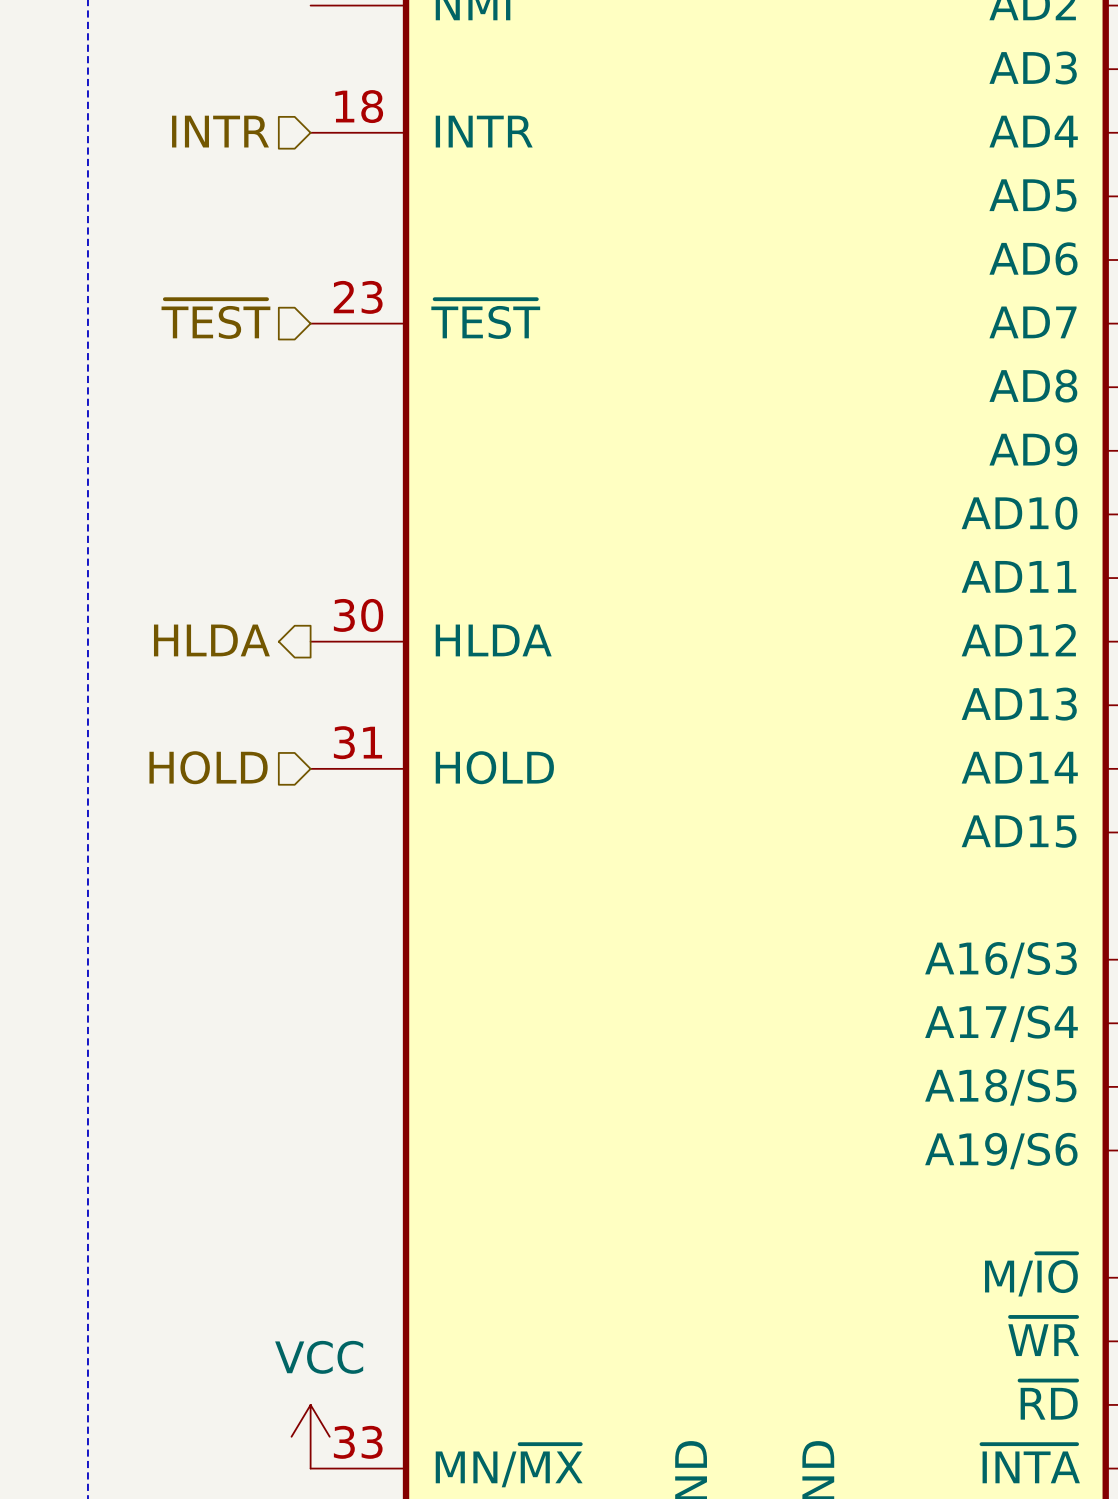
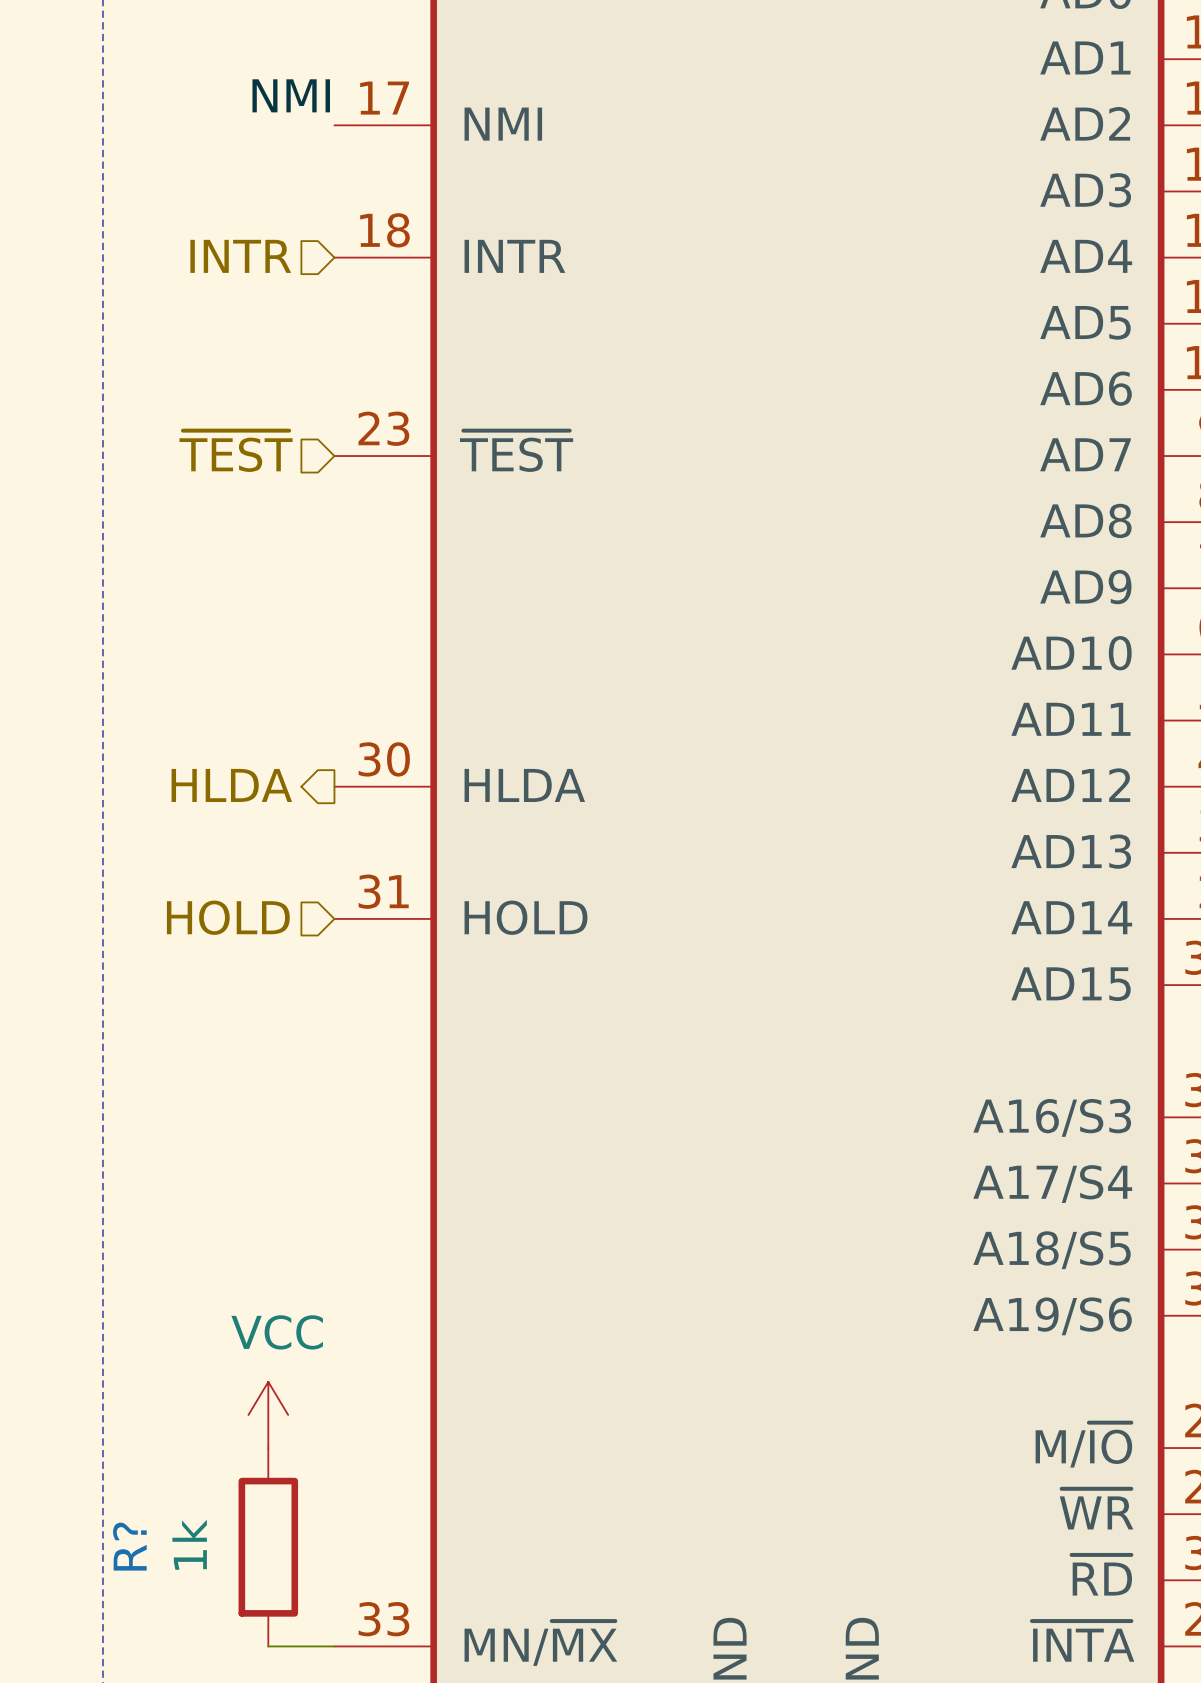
R?: none -> 1k (268, 1547)
power symbol position: VCC (310, 1436) -> VCC (268, 1414)
wire: none -> (268, 1646) (334, 1646)

